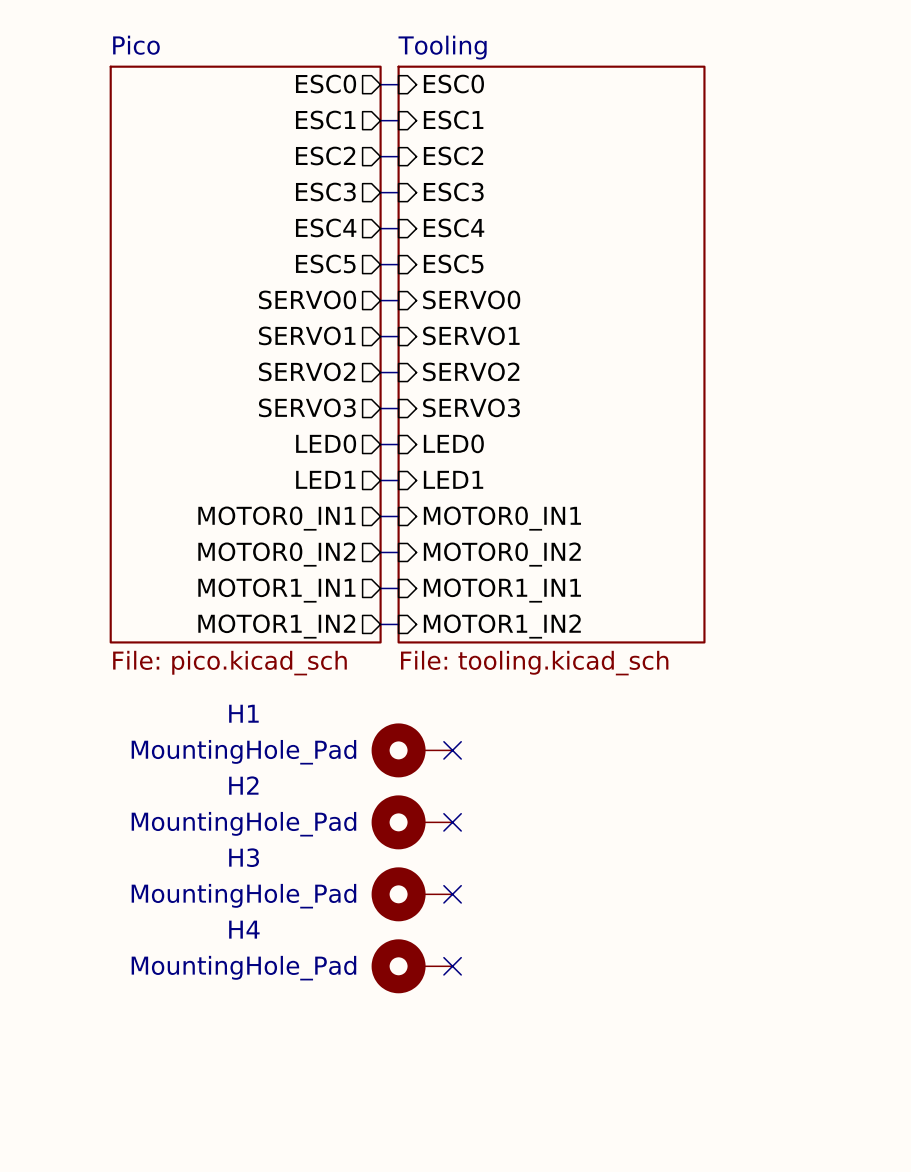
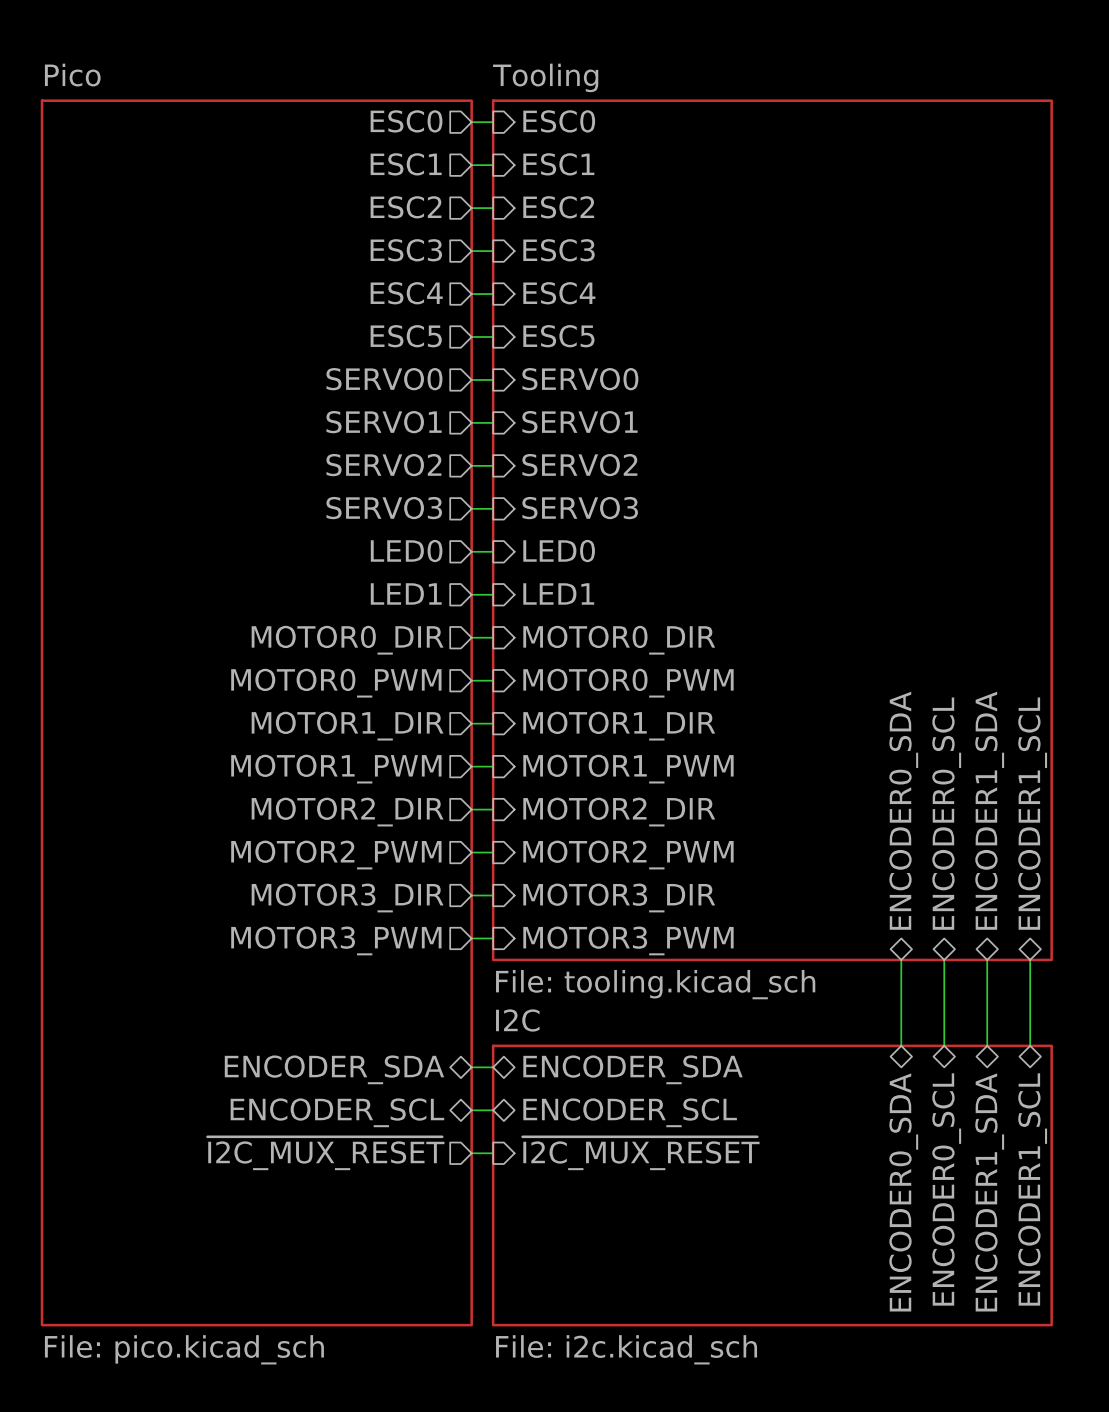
sheet Pico: File: pico.kicad_sch (245, 354) -> none
sheet Tooling: File: tooling.kicad_sch (551, 354) -> none
sheet Tooling: none -> File: tooling.kicad_sch (772, 530)
sheet pin: MOTOR0_IN1 (276, 518) -> MOTOR0_DIR (347, 640)
sheet pin: MOTOR0_IN1 (502, 518) -> MOTOR0_DIR (619, 640)
sheet pin: MOTOR0_IN2 (276, 554) -> MOTOR0_PWM (336, 683)
sheet pin: MOTOR0_IN2 (502, 554) -> MOTOR0_PWM (628, 683)
sheet Pico: none -> File: pico.kicad_sch (256, 712)
sheet pin: MOTOR1_IN1 (276, 590) -> MOTOR1_DIR (347, 726)
sheet pin: MOTOR1_IN1 (502, 590) -> MOTOR1_DIR (619, 726)
sheet pin: MOTOR1_IN2 (276, 626) -> MOTOR1_PWM (336, 769)
sheet pin: MOTOR1_IN2 (502, 626) -> MOTOR1_PWM (628, 769)
wire: none -> (471, 809) (493, 809)
sheet pin: none -> ENCODER0_SDA (903, 810)
sheet pin: none -> ENCODER1_SDA (989, 810)
sheet pin: none -> MOTOR2_DIR (347, 812)
sheet pin: none -> MOTOR2_DIR (619, 812)
sheet pin: none -> ENCODER0_SCL (946, 813)
sheet pin: none -> ENCODER1_SCL (1032, 813)
wire: none -> (471, 852) (493, 852)
sheet pin: none -> MOTOR2_PWM (336, 855)
sheet pin: none -> MOTOR2_PWM (628, 855)
sheet pin: none -> MOTOR3_DIR (347, 897)
sheet pin: none -> MOTOR3_DIR (619, 897)
H1: MountingHole_Pad (412, 750) -> none
no-connect mark: (452, 750) -> none
sheet pin: none -> MOTOR3_PWM (336, 940)
sheet pin: none -> MOTOR3_PWM (628, 940)
wire: none -> (901, 959) (901, 1045)
wire: none -> (944, 959) (944, 1045)
wire: none -> (987, 959) (987, 1045)
wire: none -> (1030, 959) (1030, 1045)
H2: MountingHole_Pad (412, 822) -> none
no-connect mark: (452, 822) -> none
sheet pin: none -> ENCODER_SDA (334, 1069)
sheet pin: none -> ENCODER_SDA (632, 1069)
H3: MountingHole_Pad (412, 894) -> none
no-connect mark: (452, 894) -> none
sheet pin: none -> ENCODER_SCL (337, 1112)
sheet pin: none -> ENCODER_SCL (630, 1112)
sheet pin: none -> ~{I2C_MUX_RESET} (325, 1153)
sheet pin: none -> ~{I2C_MUX_RESET} (641, 1153)
H4: MountingHole_Pad (412, 966) -> none
no-connect mark: (452, 966) -> none
sheet I2C: none -> File: i2c.kicad_sch (772, 1185)
sheet pin: none -> ENCODER0_SCL (946, 1189)
sheet pin: none -> ENCODER1_SCL (1032, 1189)
sheet pin: none -> ENCODER0_SDA (903, 1192)
sheet pin: none -> ENCODER1_SDA (989, 1192)

